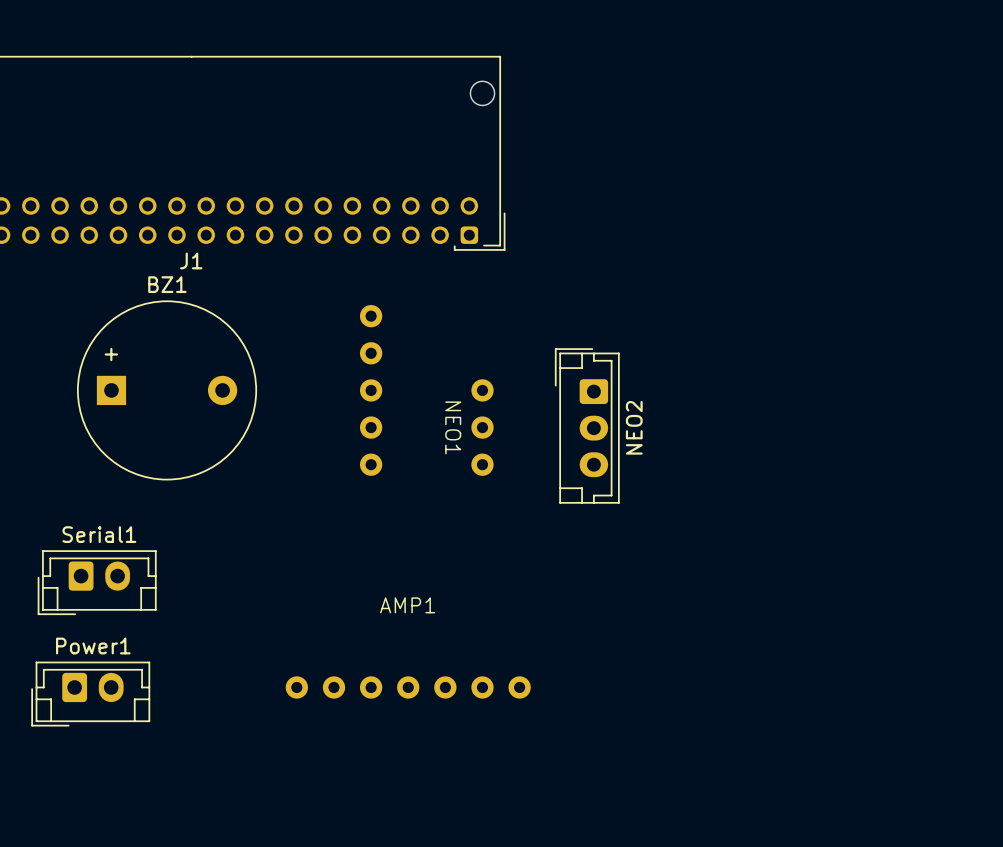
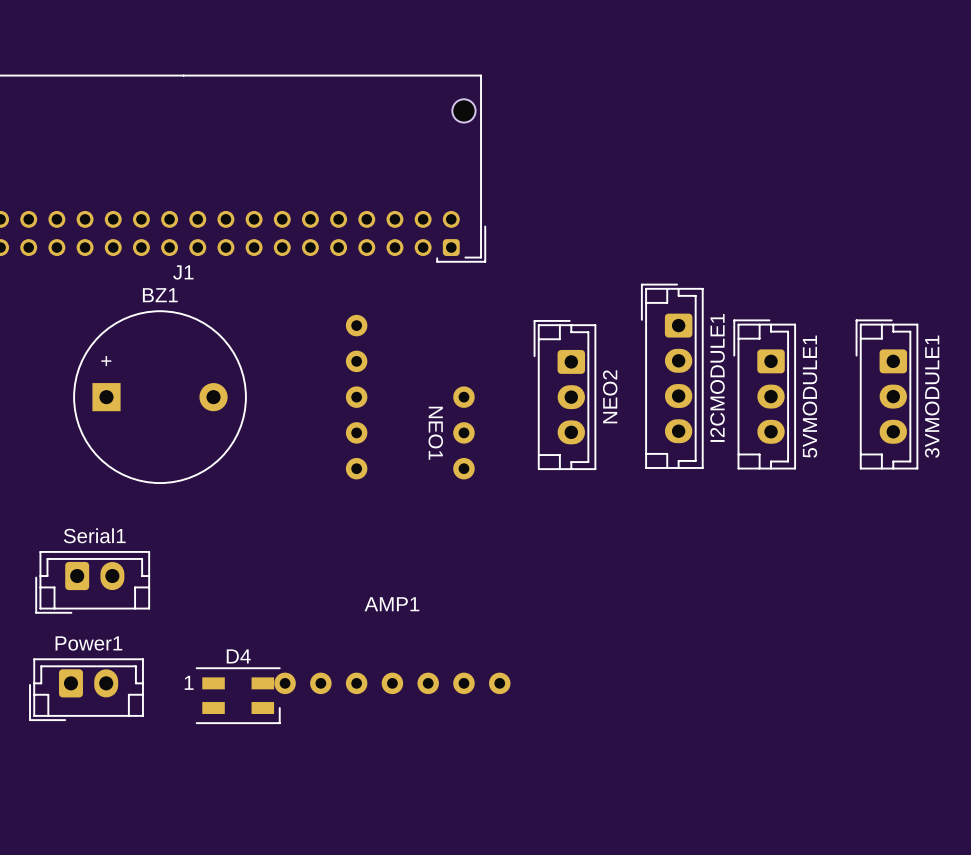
I2CMODULE1: none -> (672, 376)
5VMODULE1: none -> (764, 394)
3VMODULE1: none -> (886, 394)
NEO2 position: (587, 425) -> (564, 395)
D4: none -> (238, 695)

